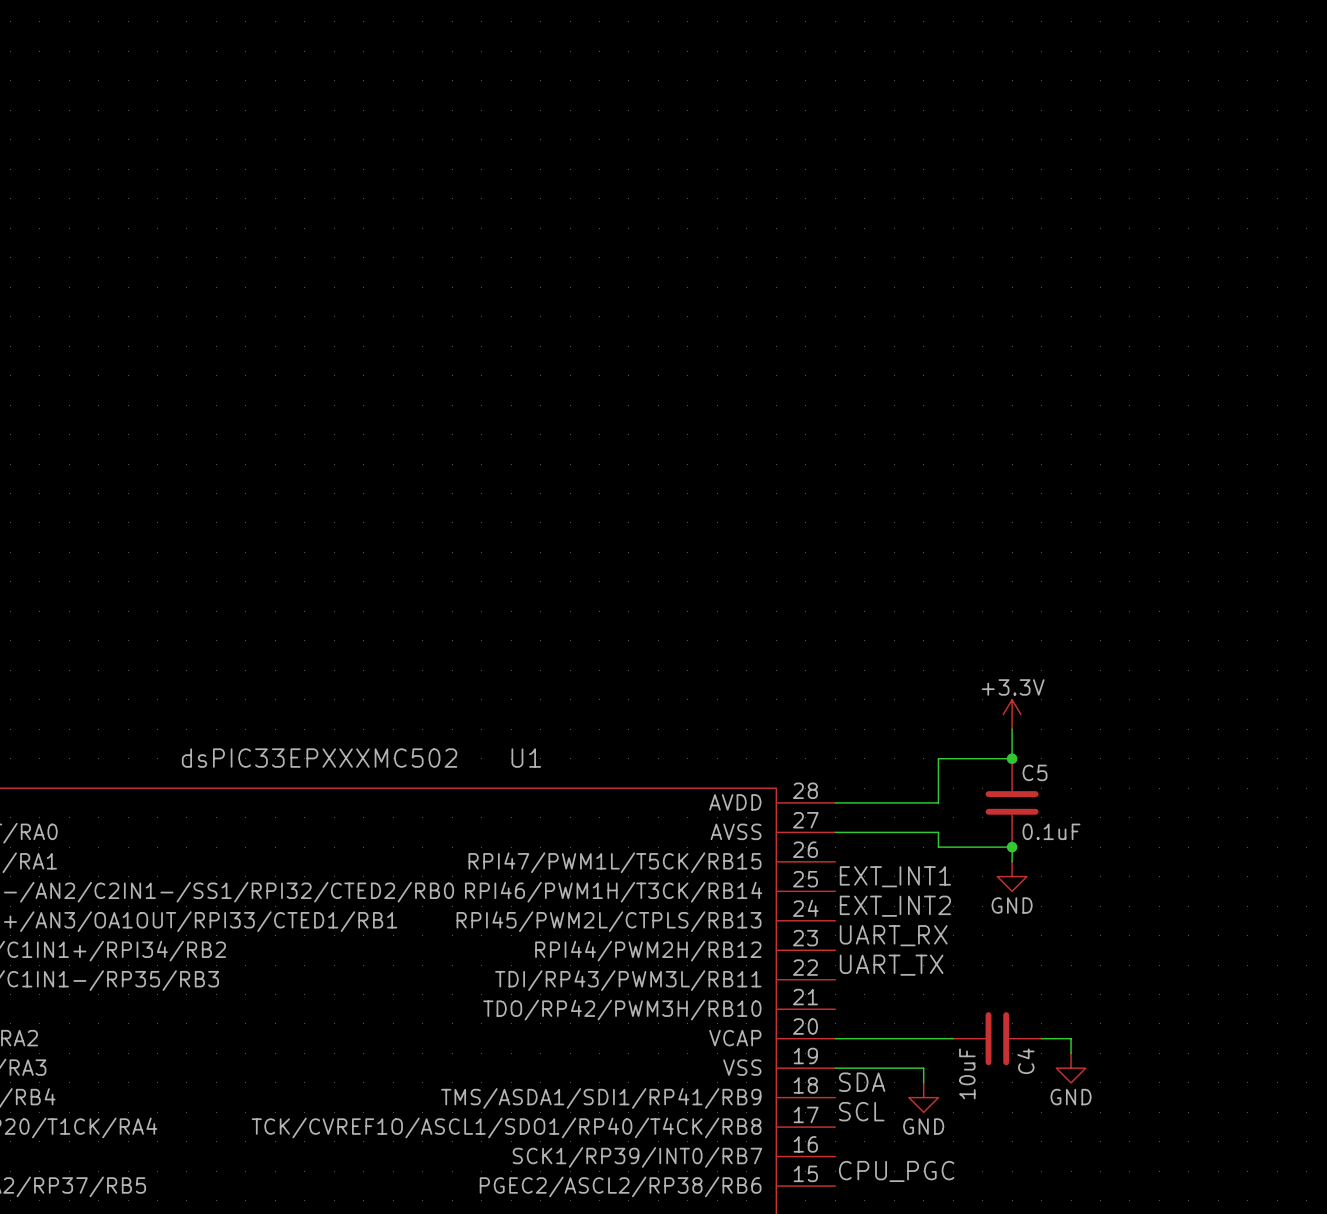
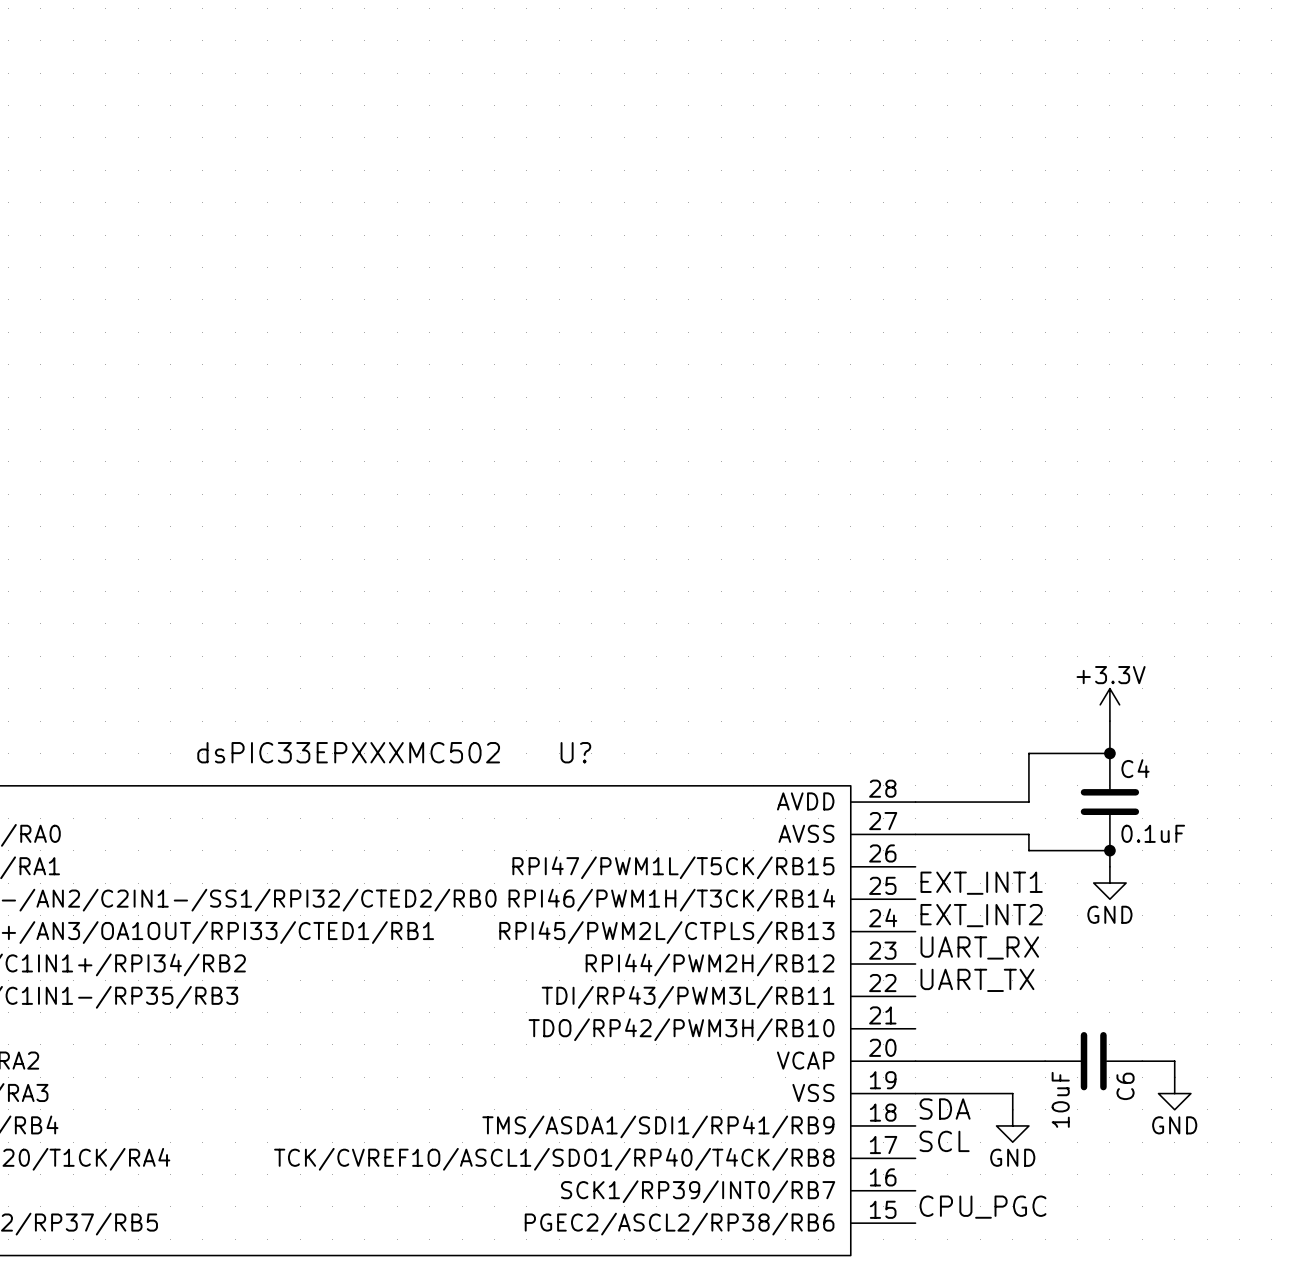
U1 name: U1 (526, 758) -> U? (575, 752)
C5 name: C5 (1035, 772) -> C4 (1135, 768)
C4 name: C4 (1025, 1061) -> C6 (1125, 1086)

